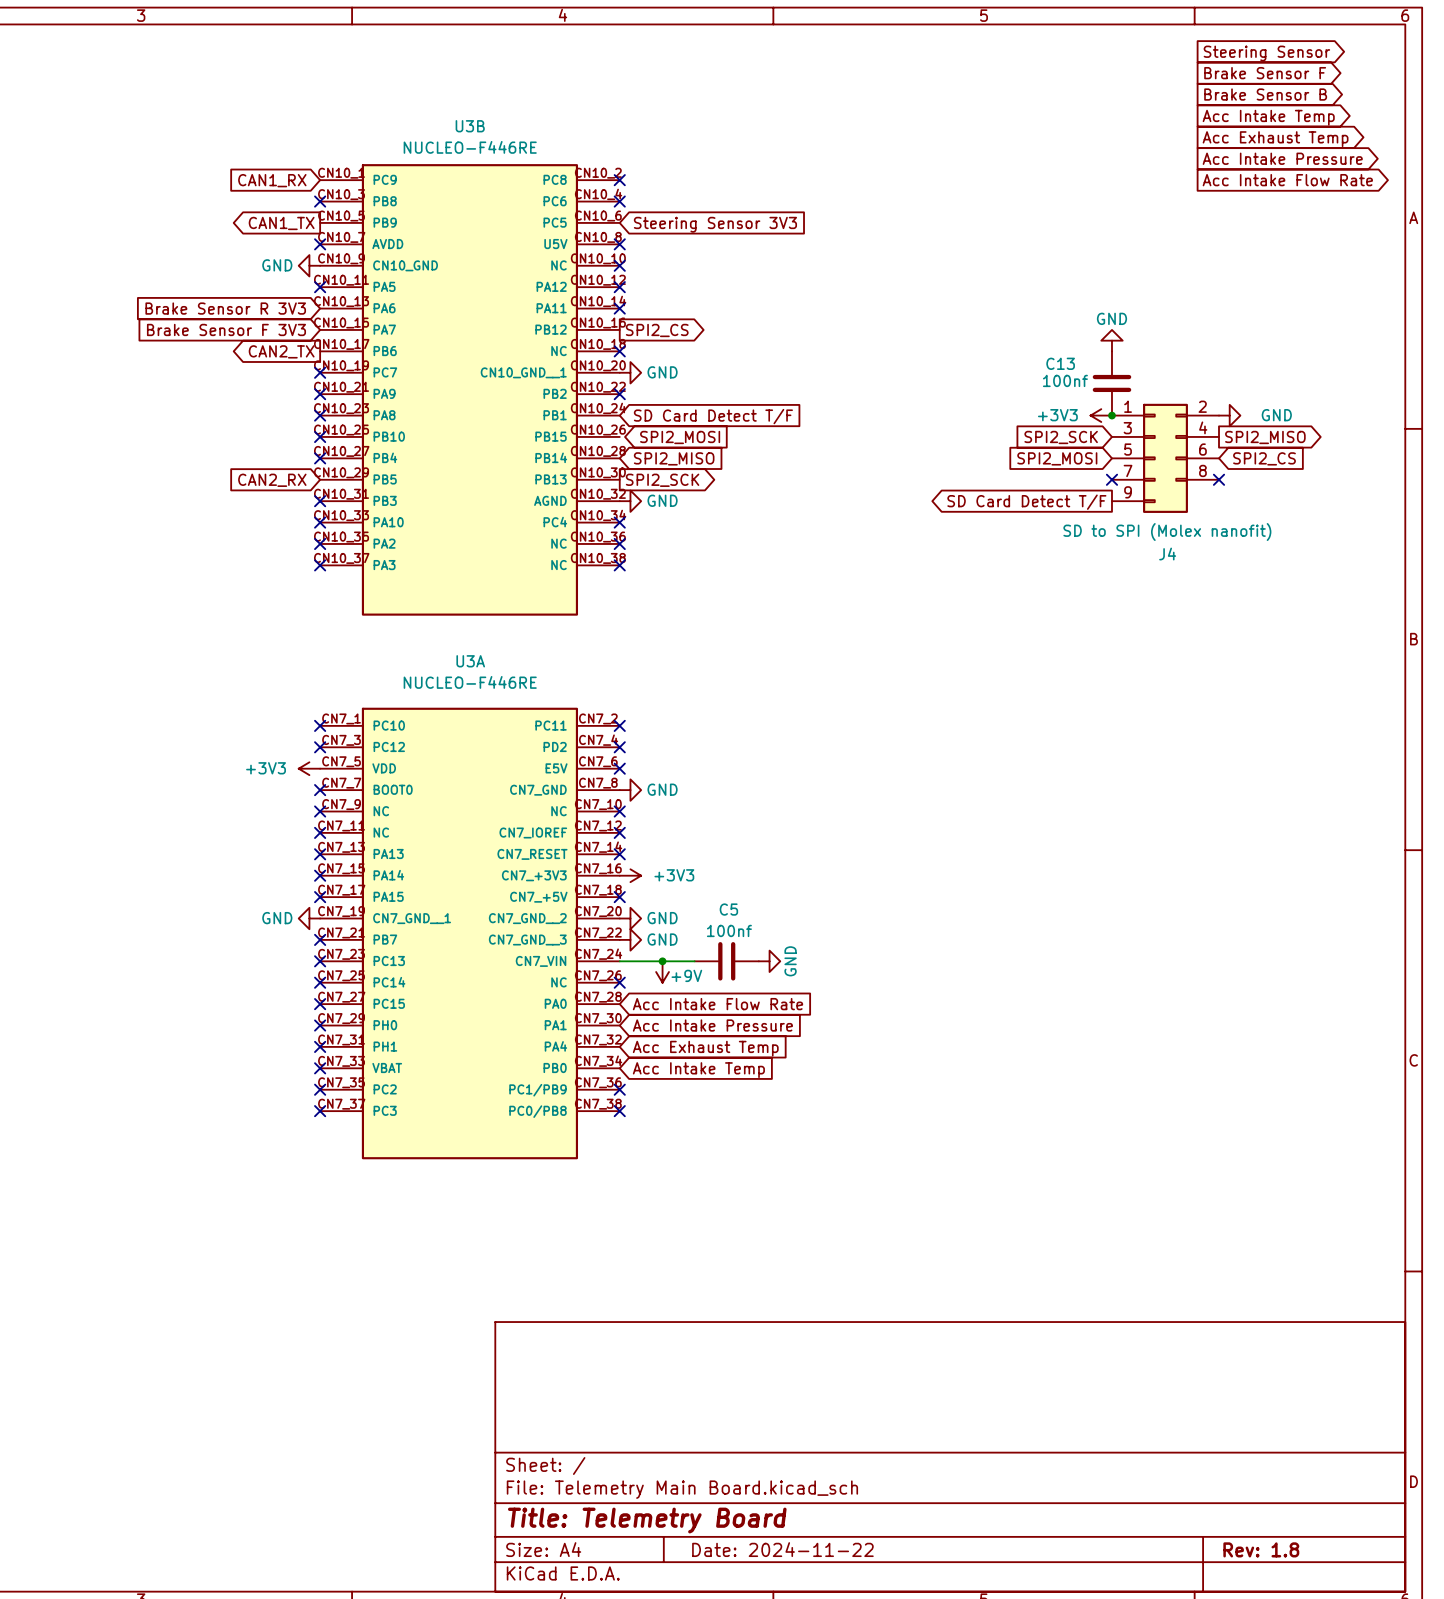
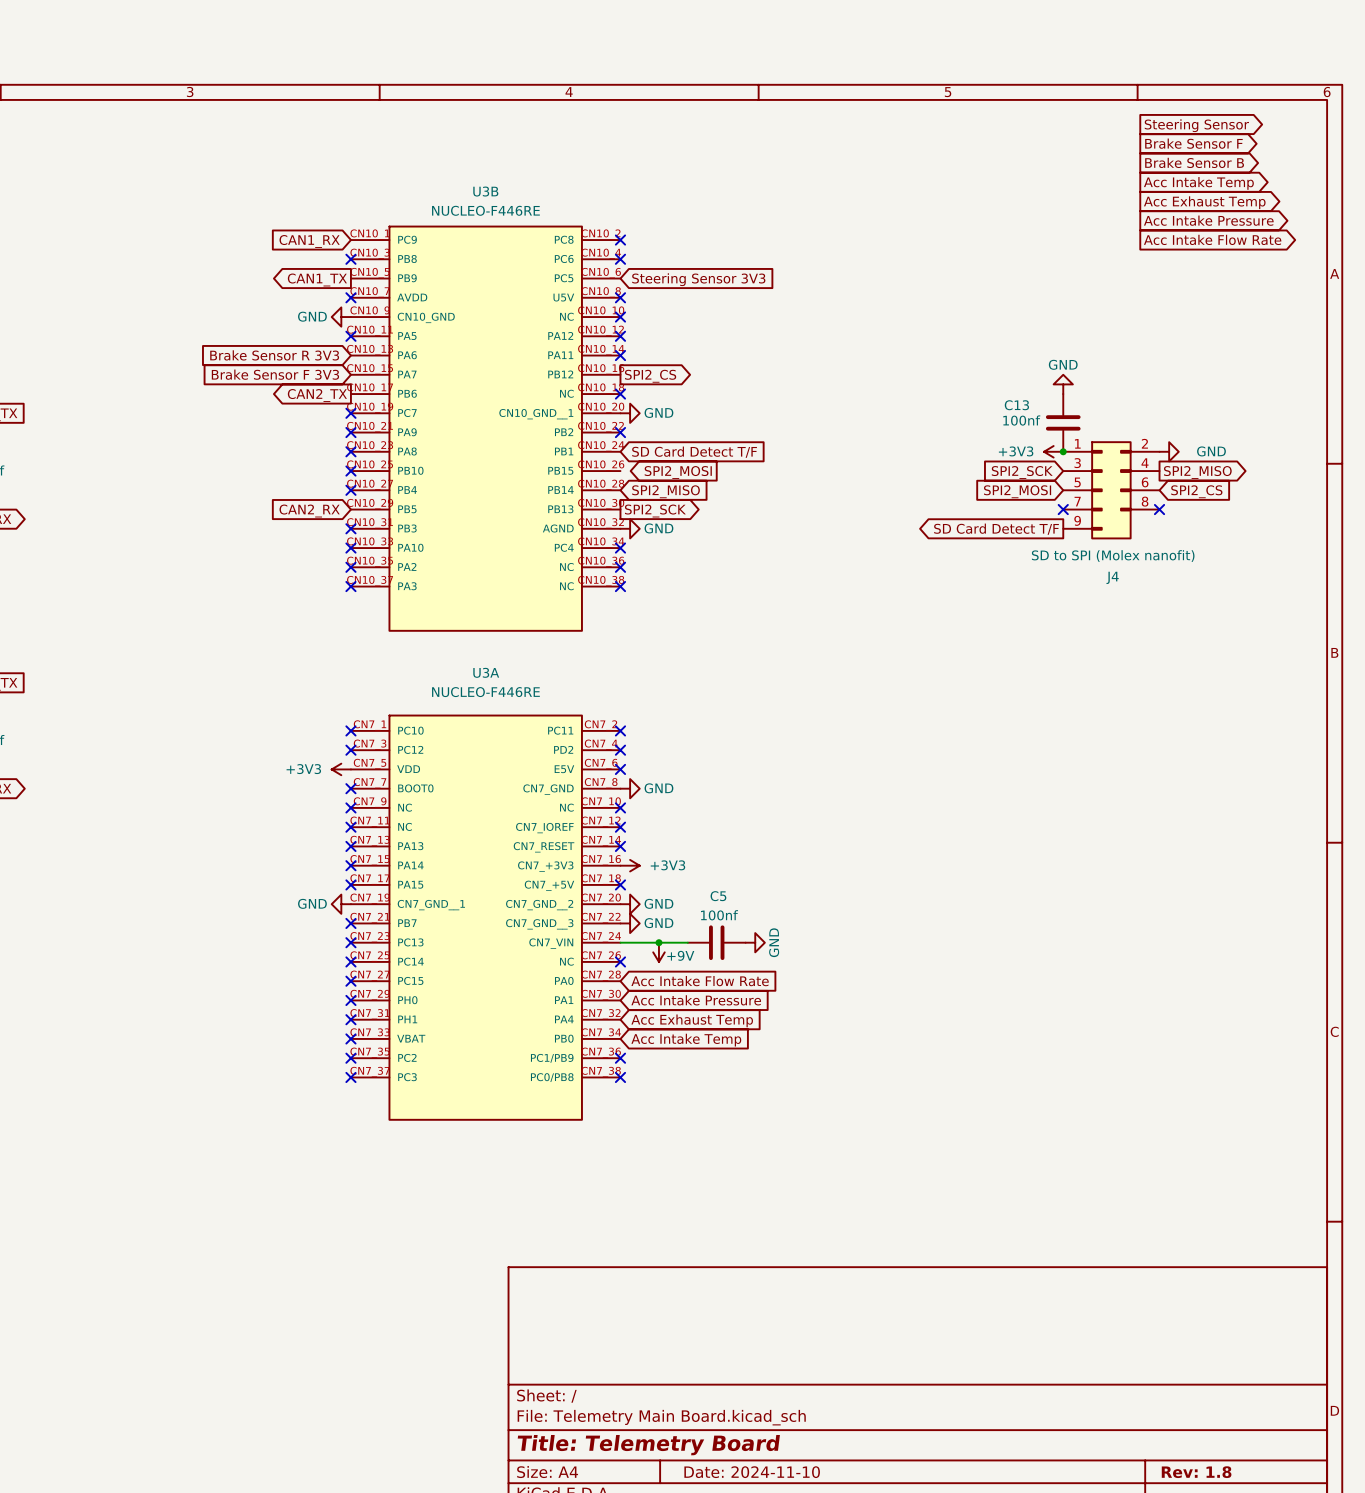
title block: Date: 2024-11-22 (782, 1549) -> Date: 2024-11-10 (752, 1472)

